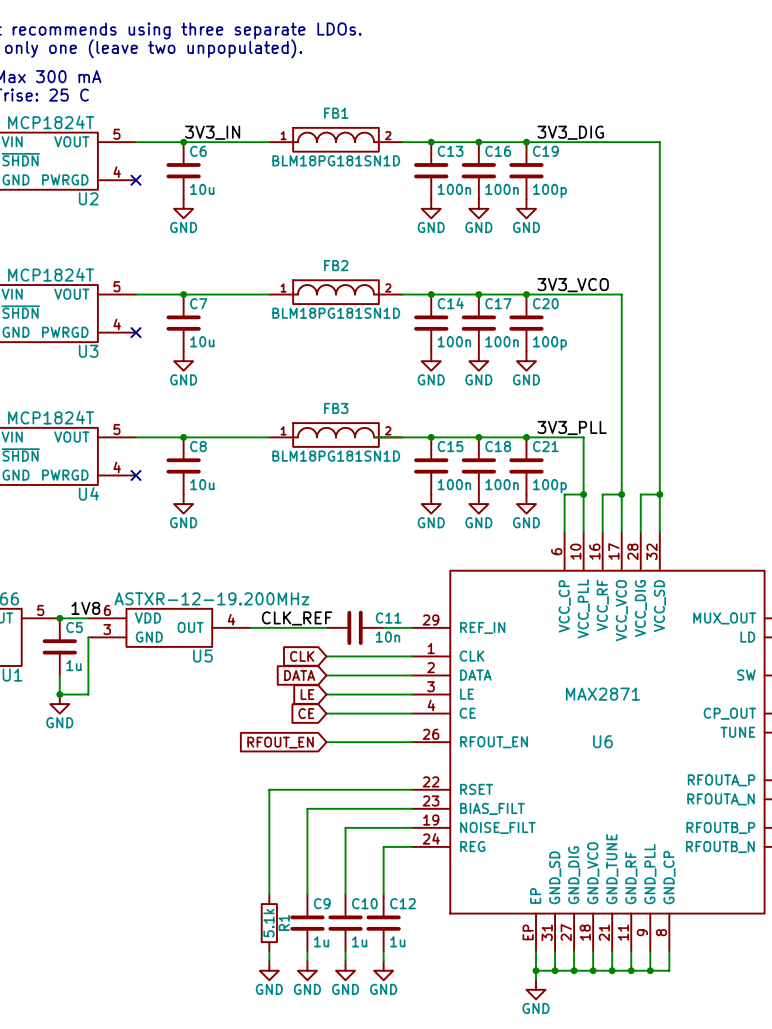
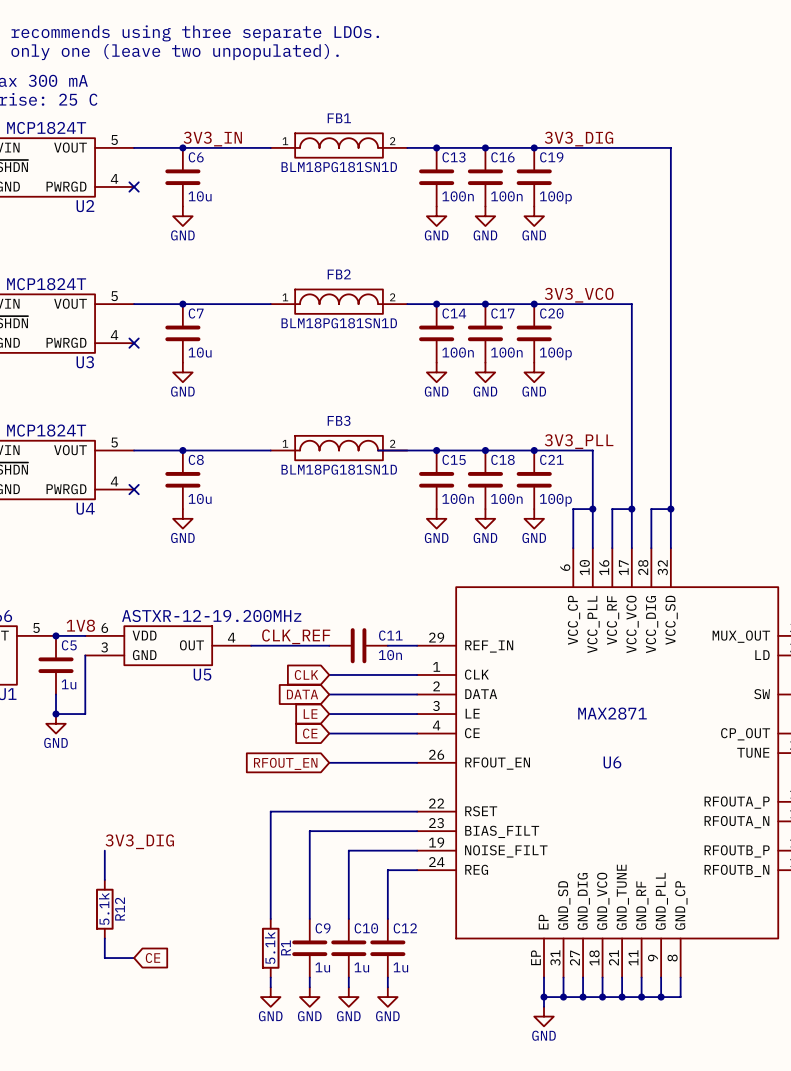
label: none -> 3V3_DIG (139, 841)
wire: none -> (104, 850) (104, 879)
R12: none -> 5.1k (104, 909)
wire: none -> (104, 938) (104, 958) (134, 958)
global label: none -> CE (152, 958)

